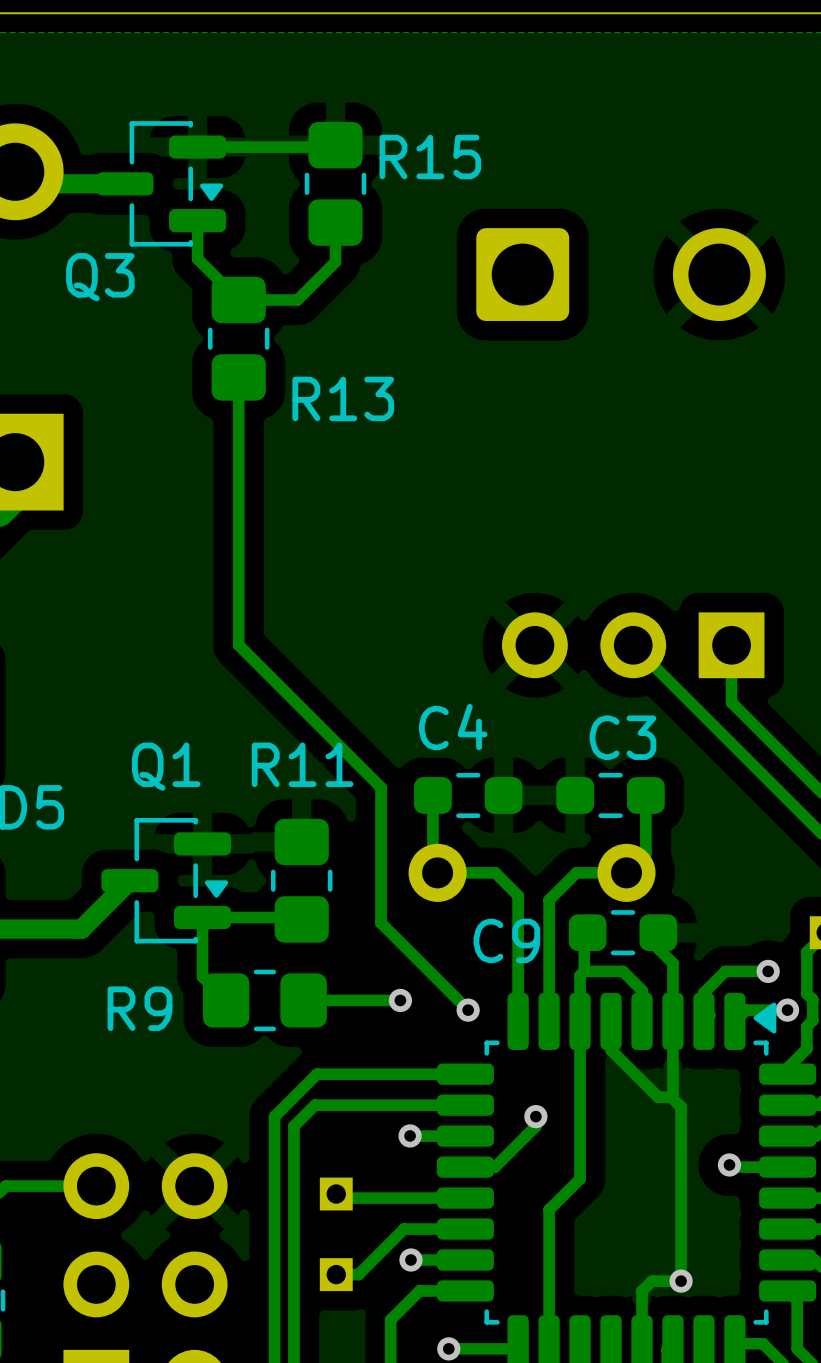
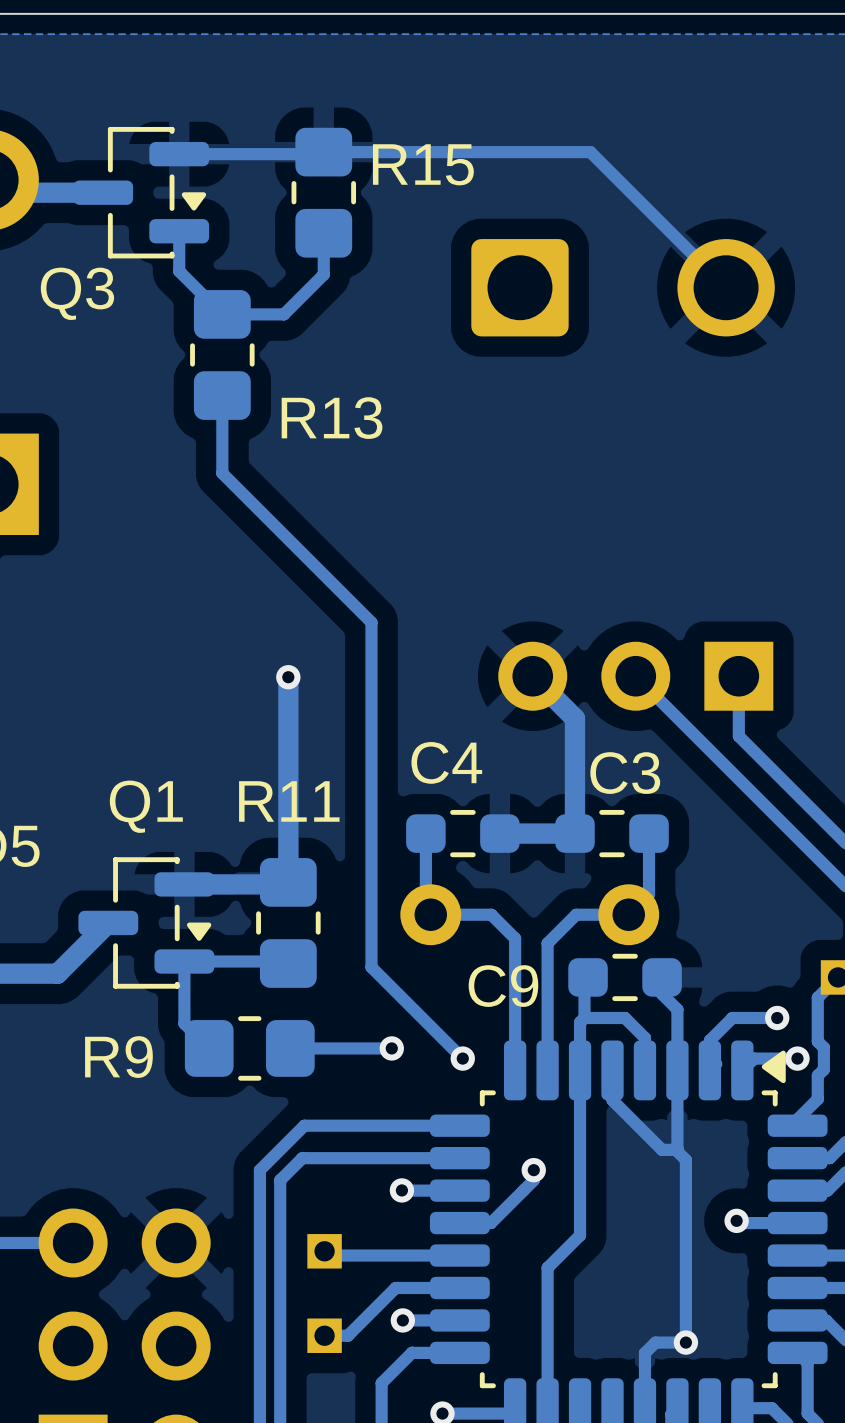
track: none -> (323, 152) (590, 152) (726, 287)
track: (238, 451) (238, 645) (381, 787) -> (222, 473) (371, 622) (371, 825)
track: none -> (532, 676) (574, 718) (574, 833) (499, 833)
track: none -> (288, 677) (288, 882) (286, 884) (184, 884)
via: none -> (288, 677)

